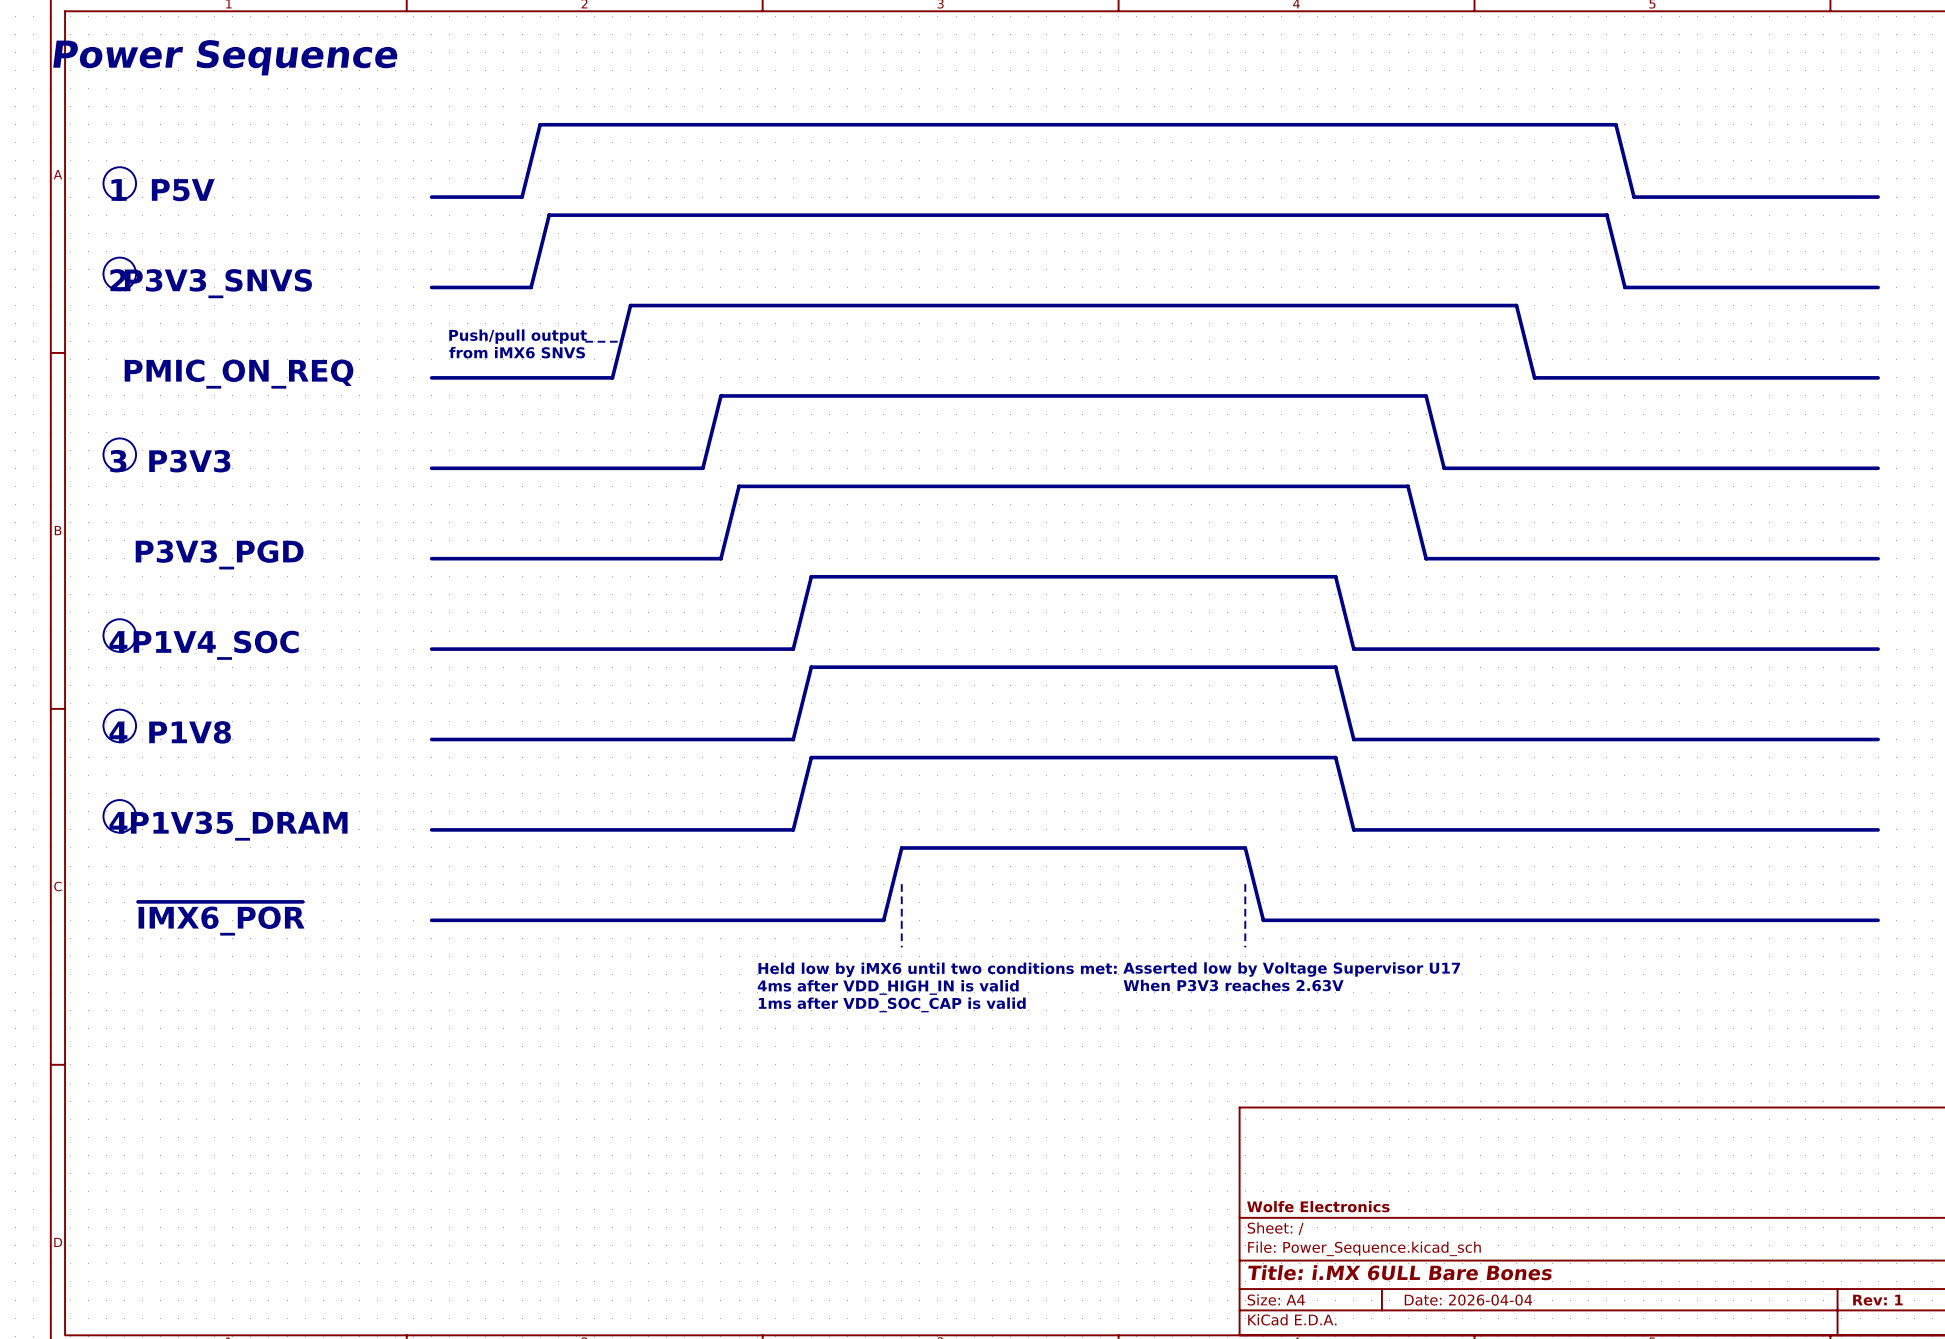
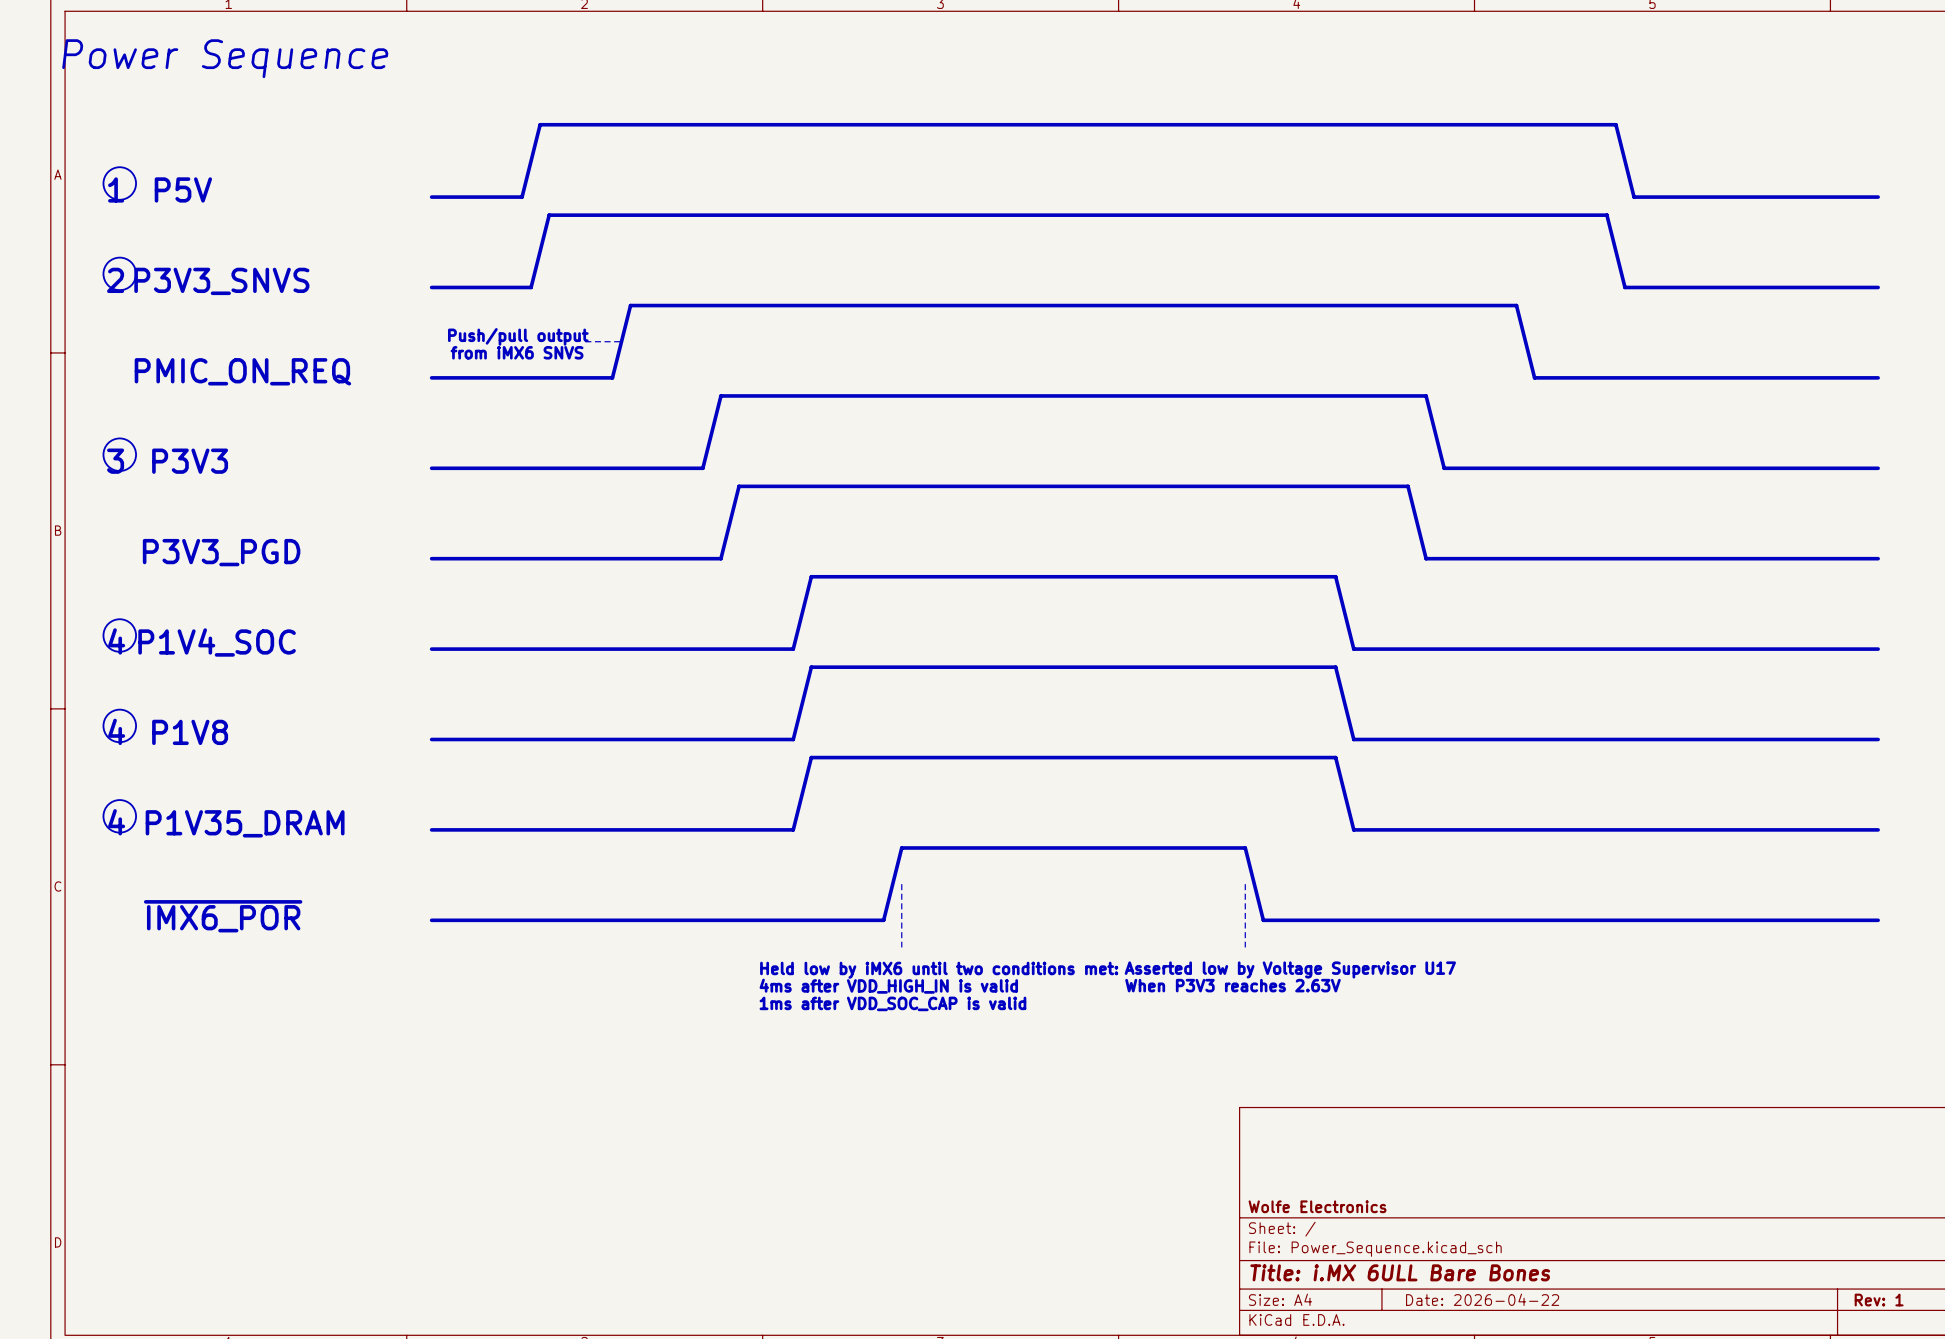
title block: Date: 2026-04-04 (1468, 1300) -> Date: 2026-04-22 (1482, 1299)

